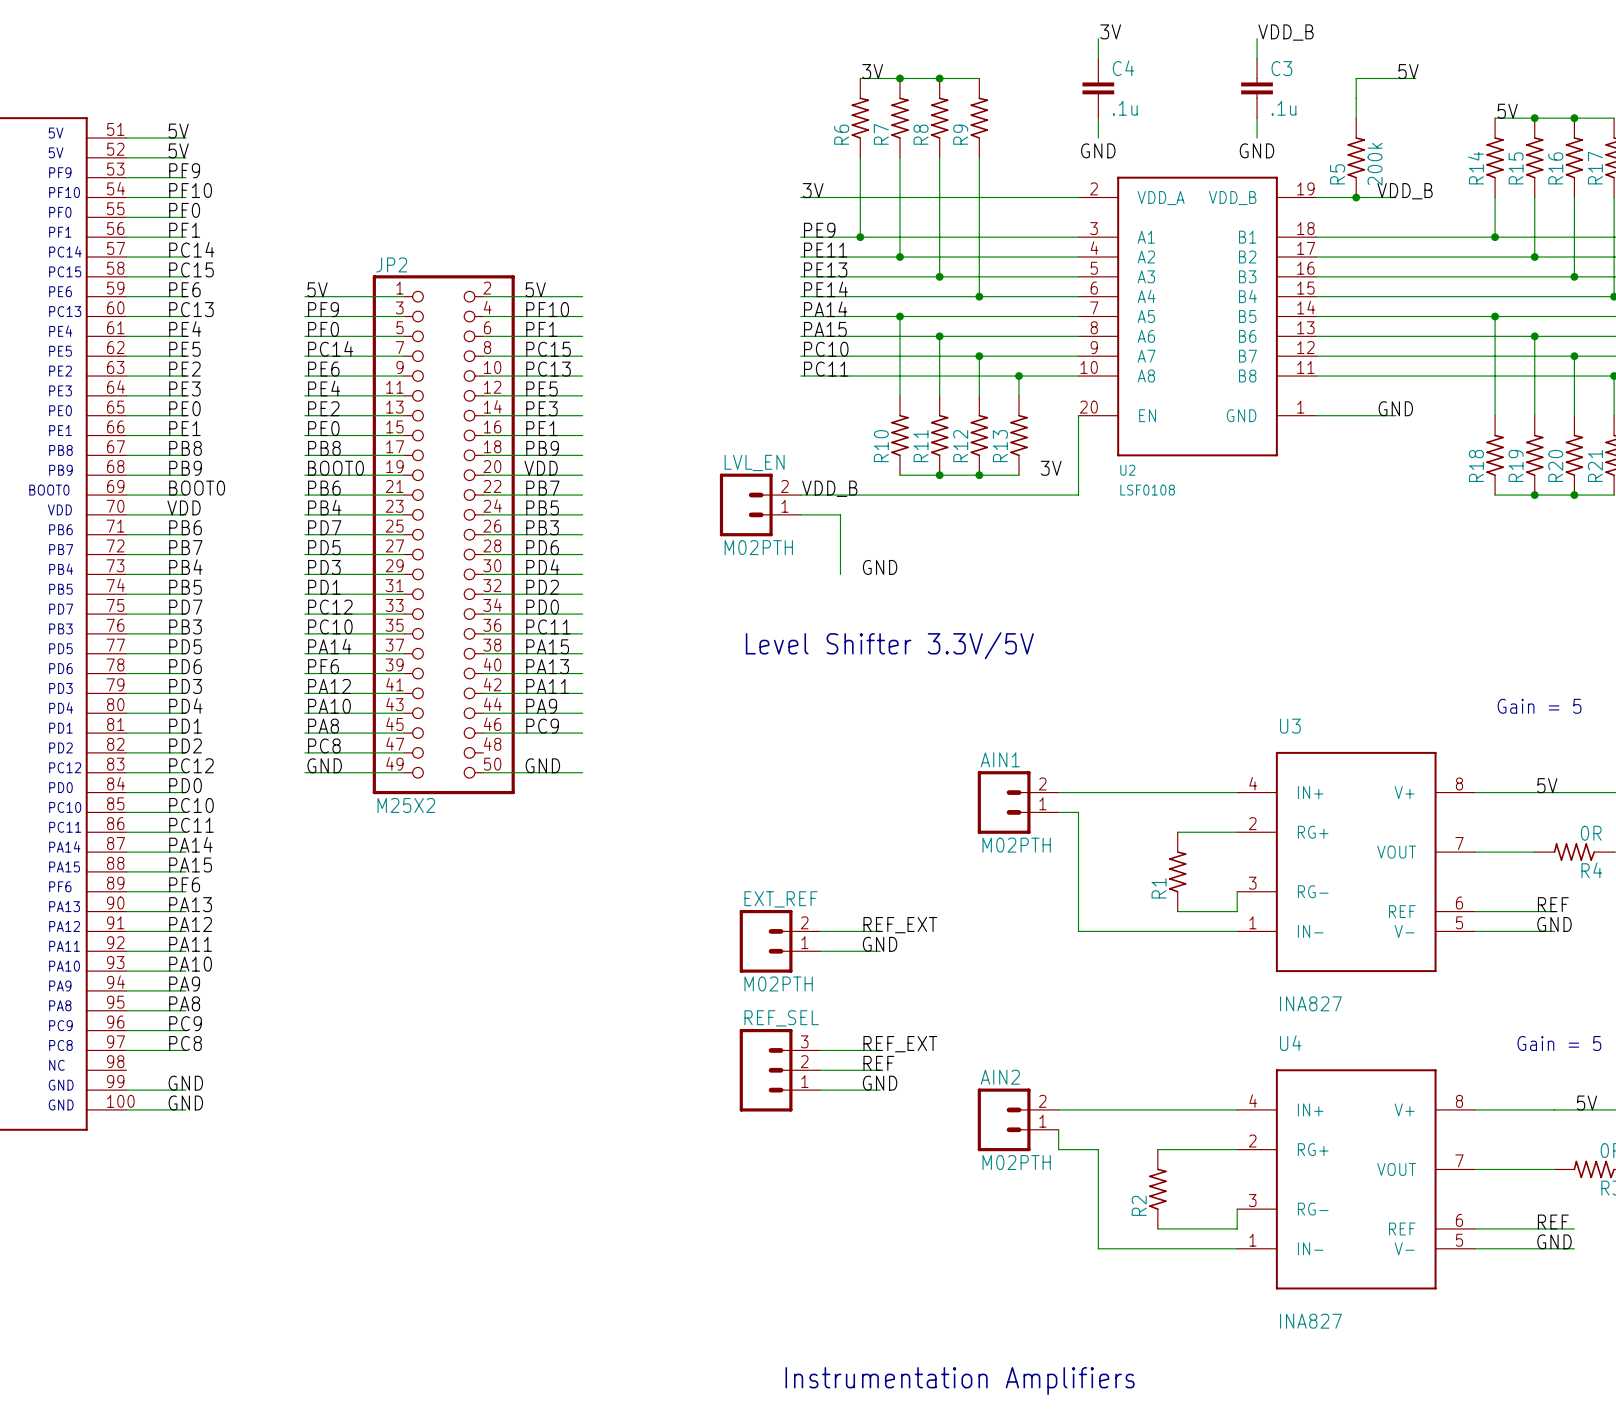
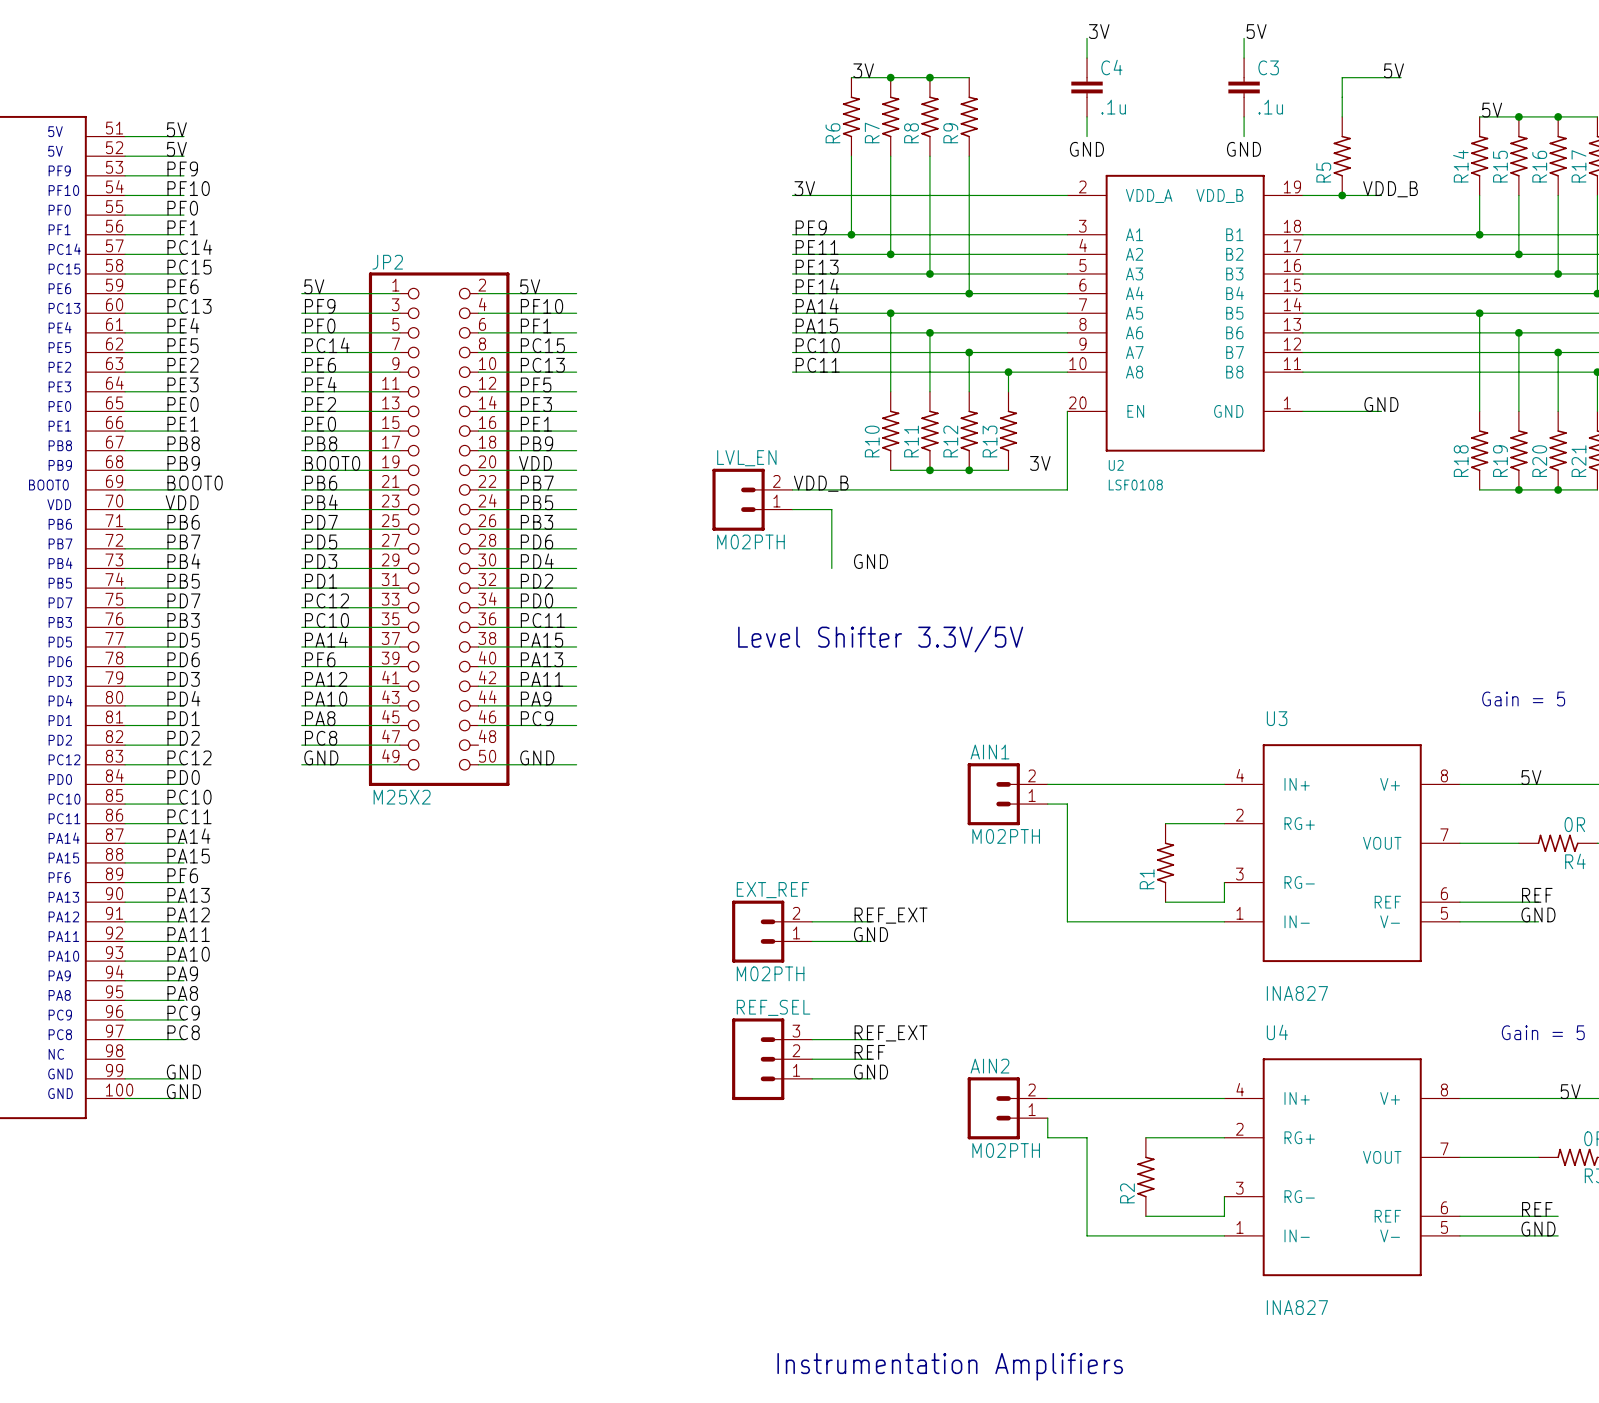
label: VDD_B (1286, 32) -> 5V (1256, 31)
R5 value: 200k (1375, 164) -> none
label: PE5 (541, 388) -> PF5 (536, 384)

